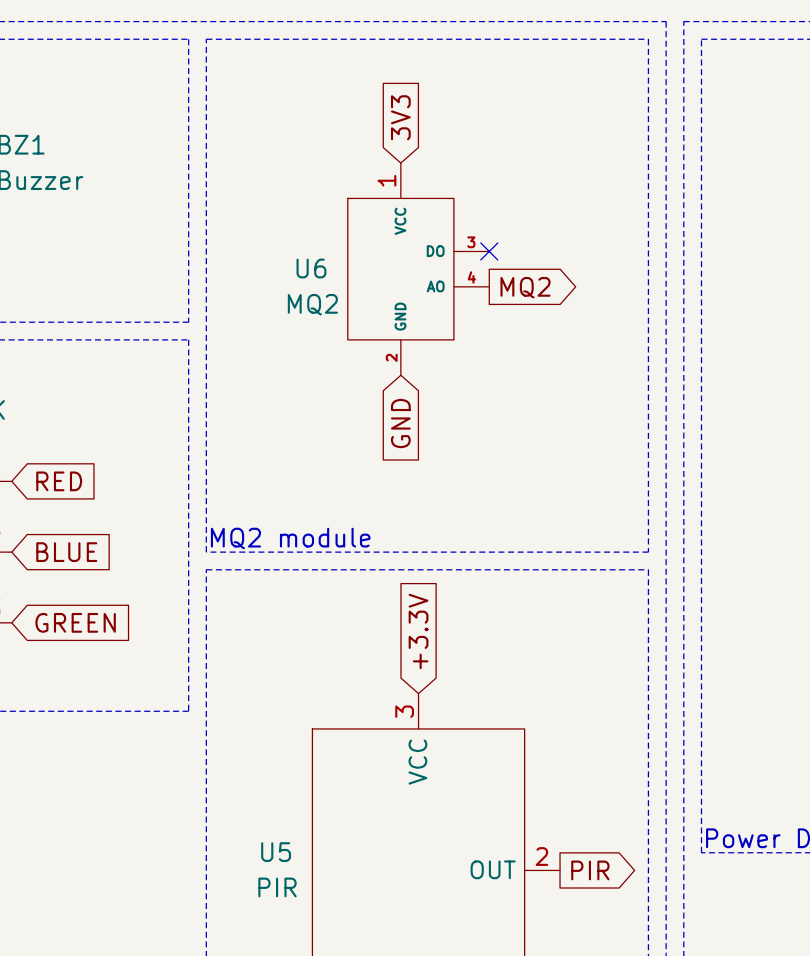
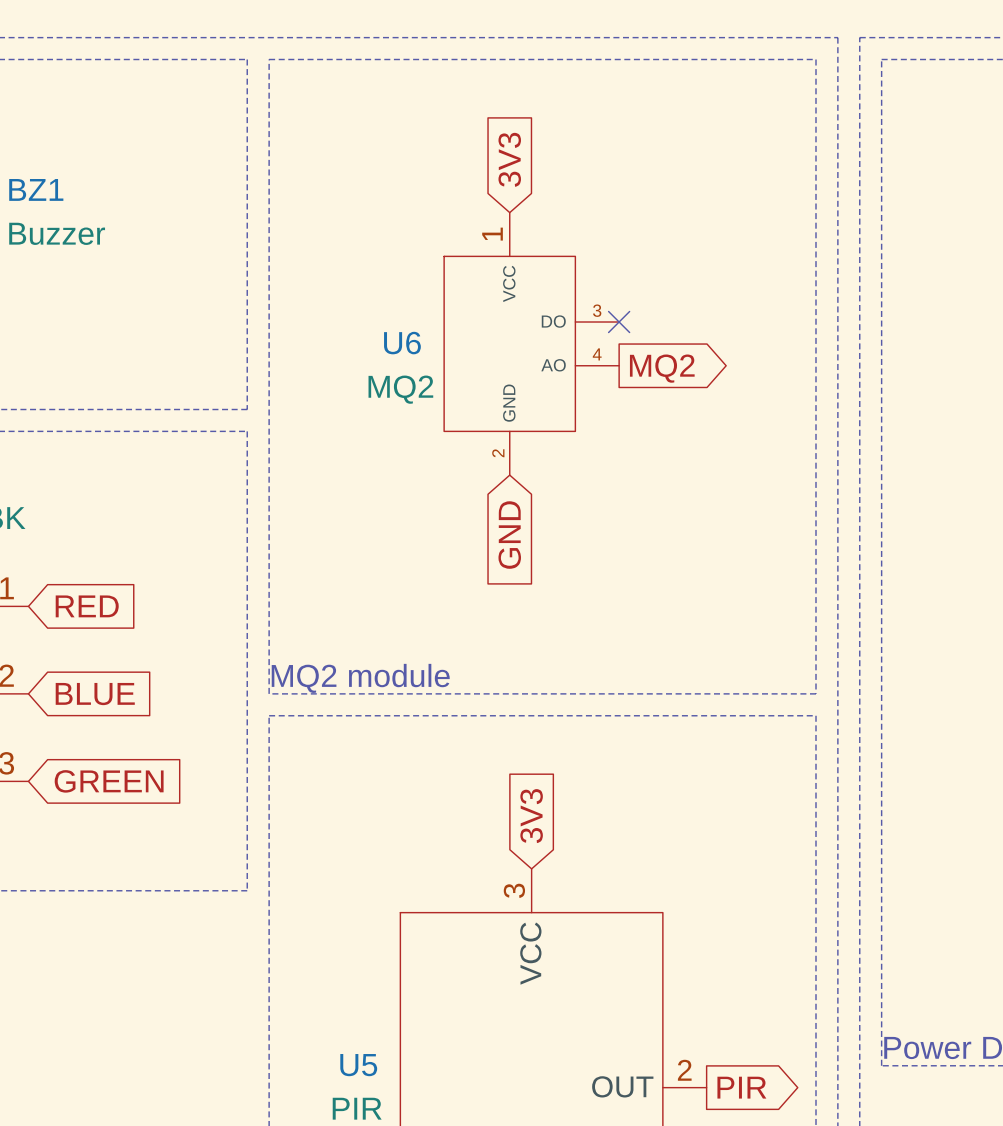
global label: +3.3V (418, 631) -> 3V3 (531, 816)

